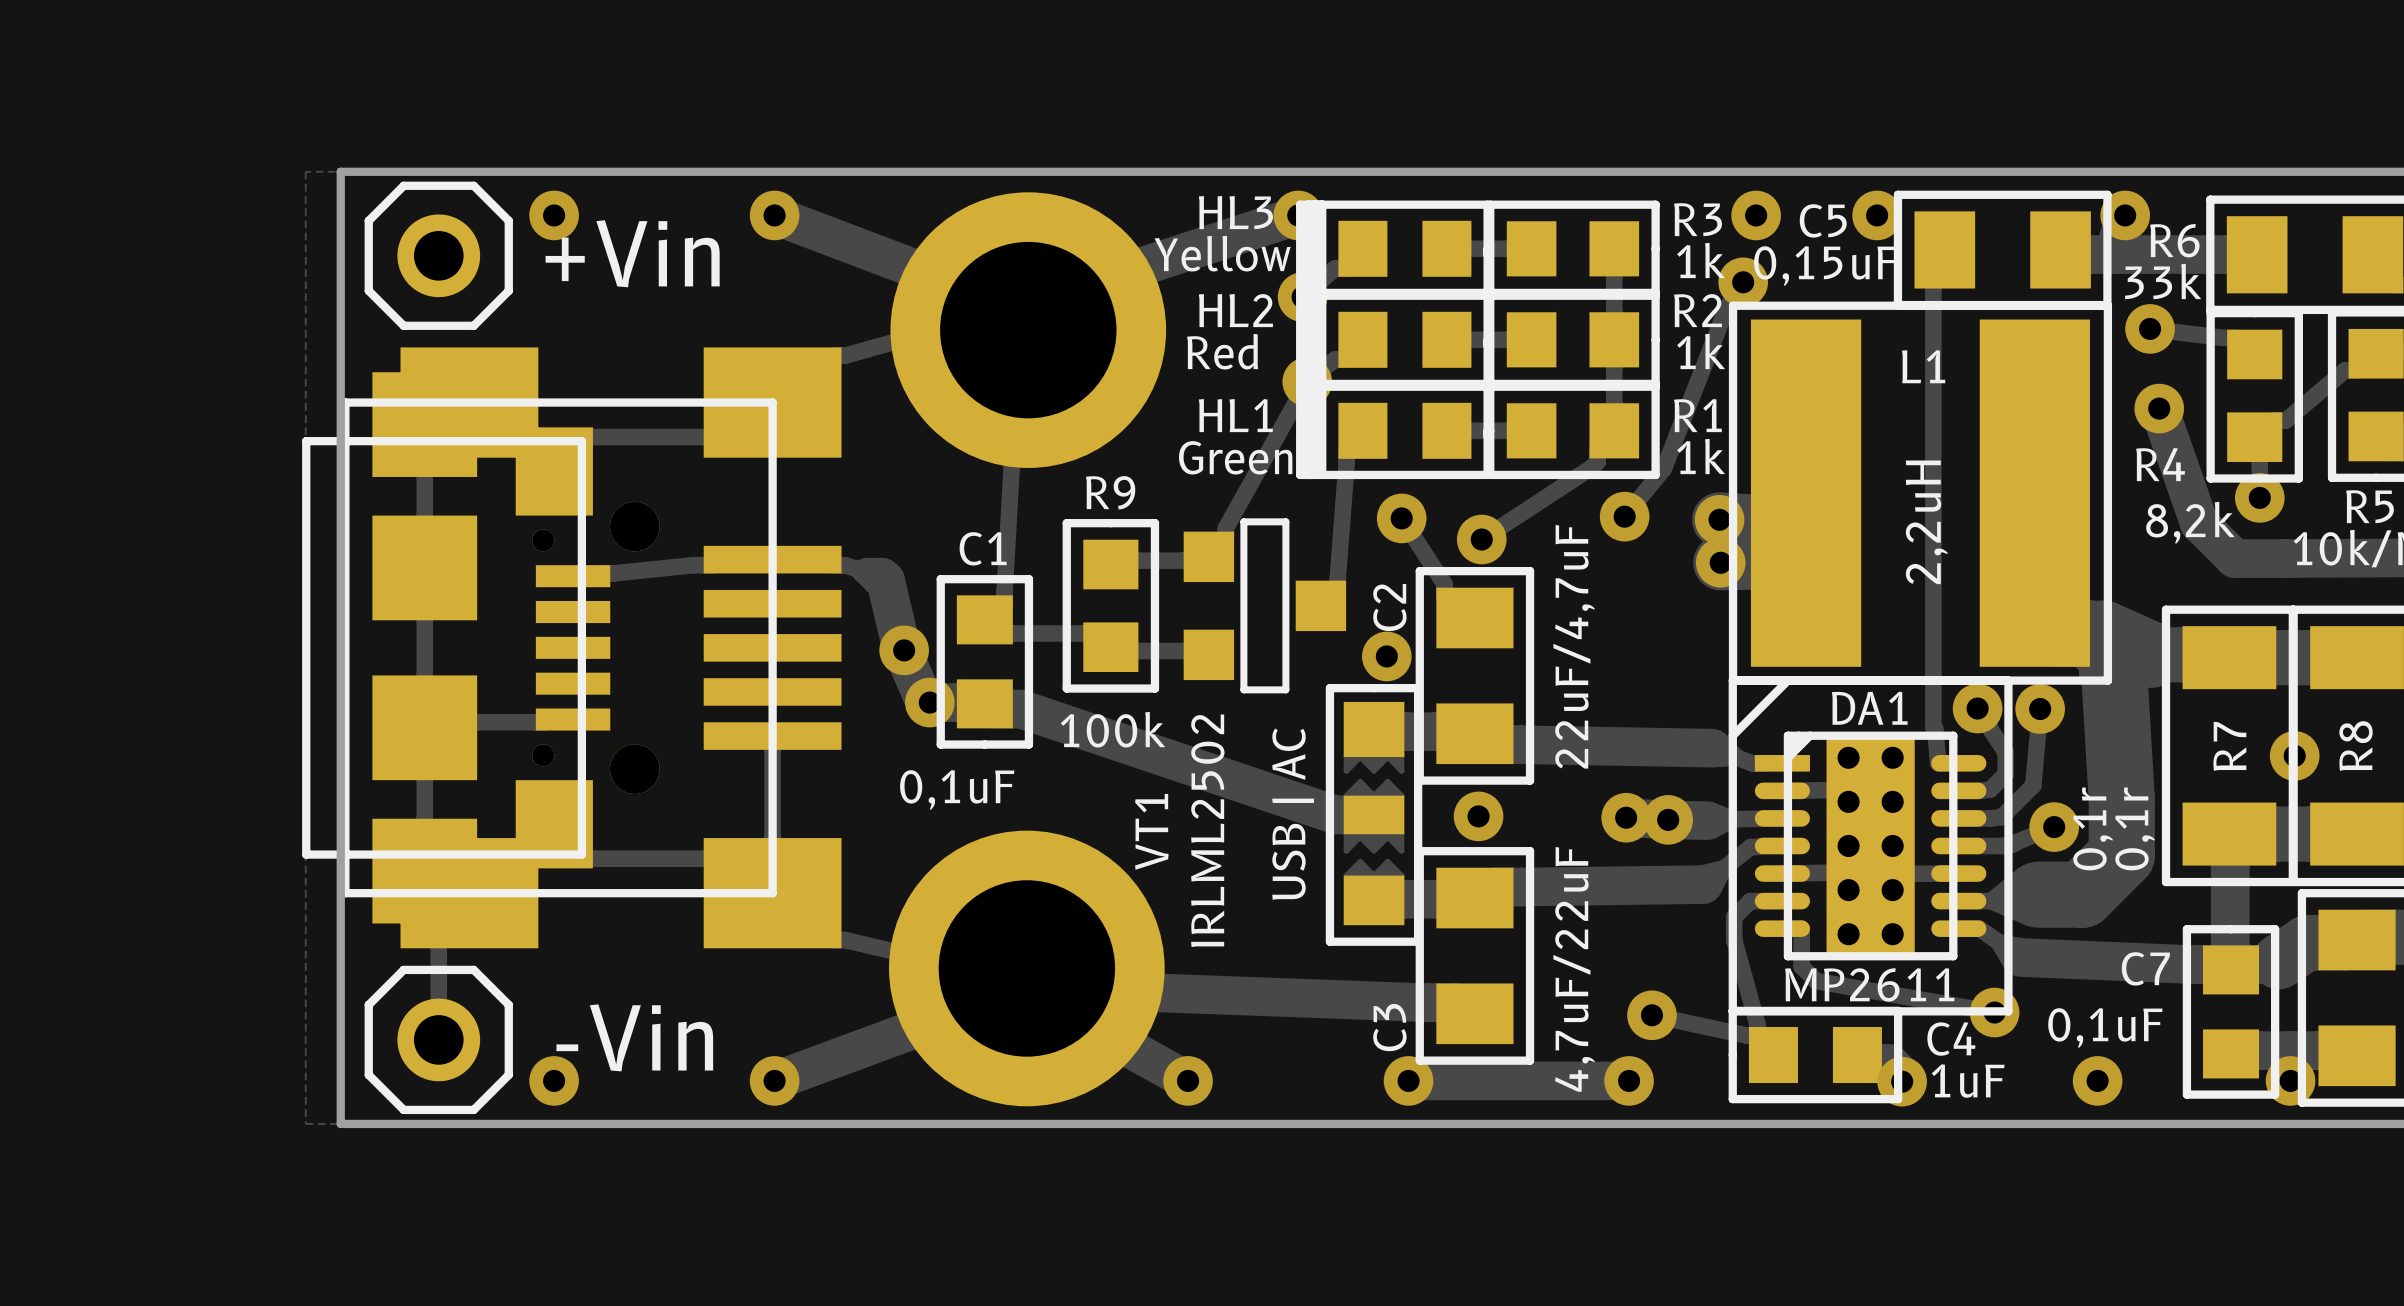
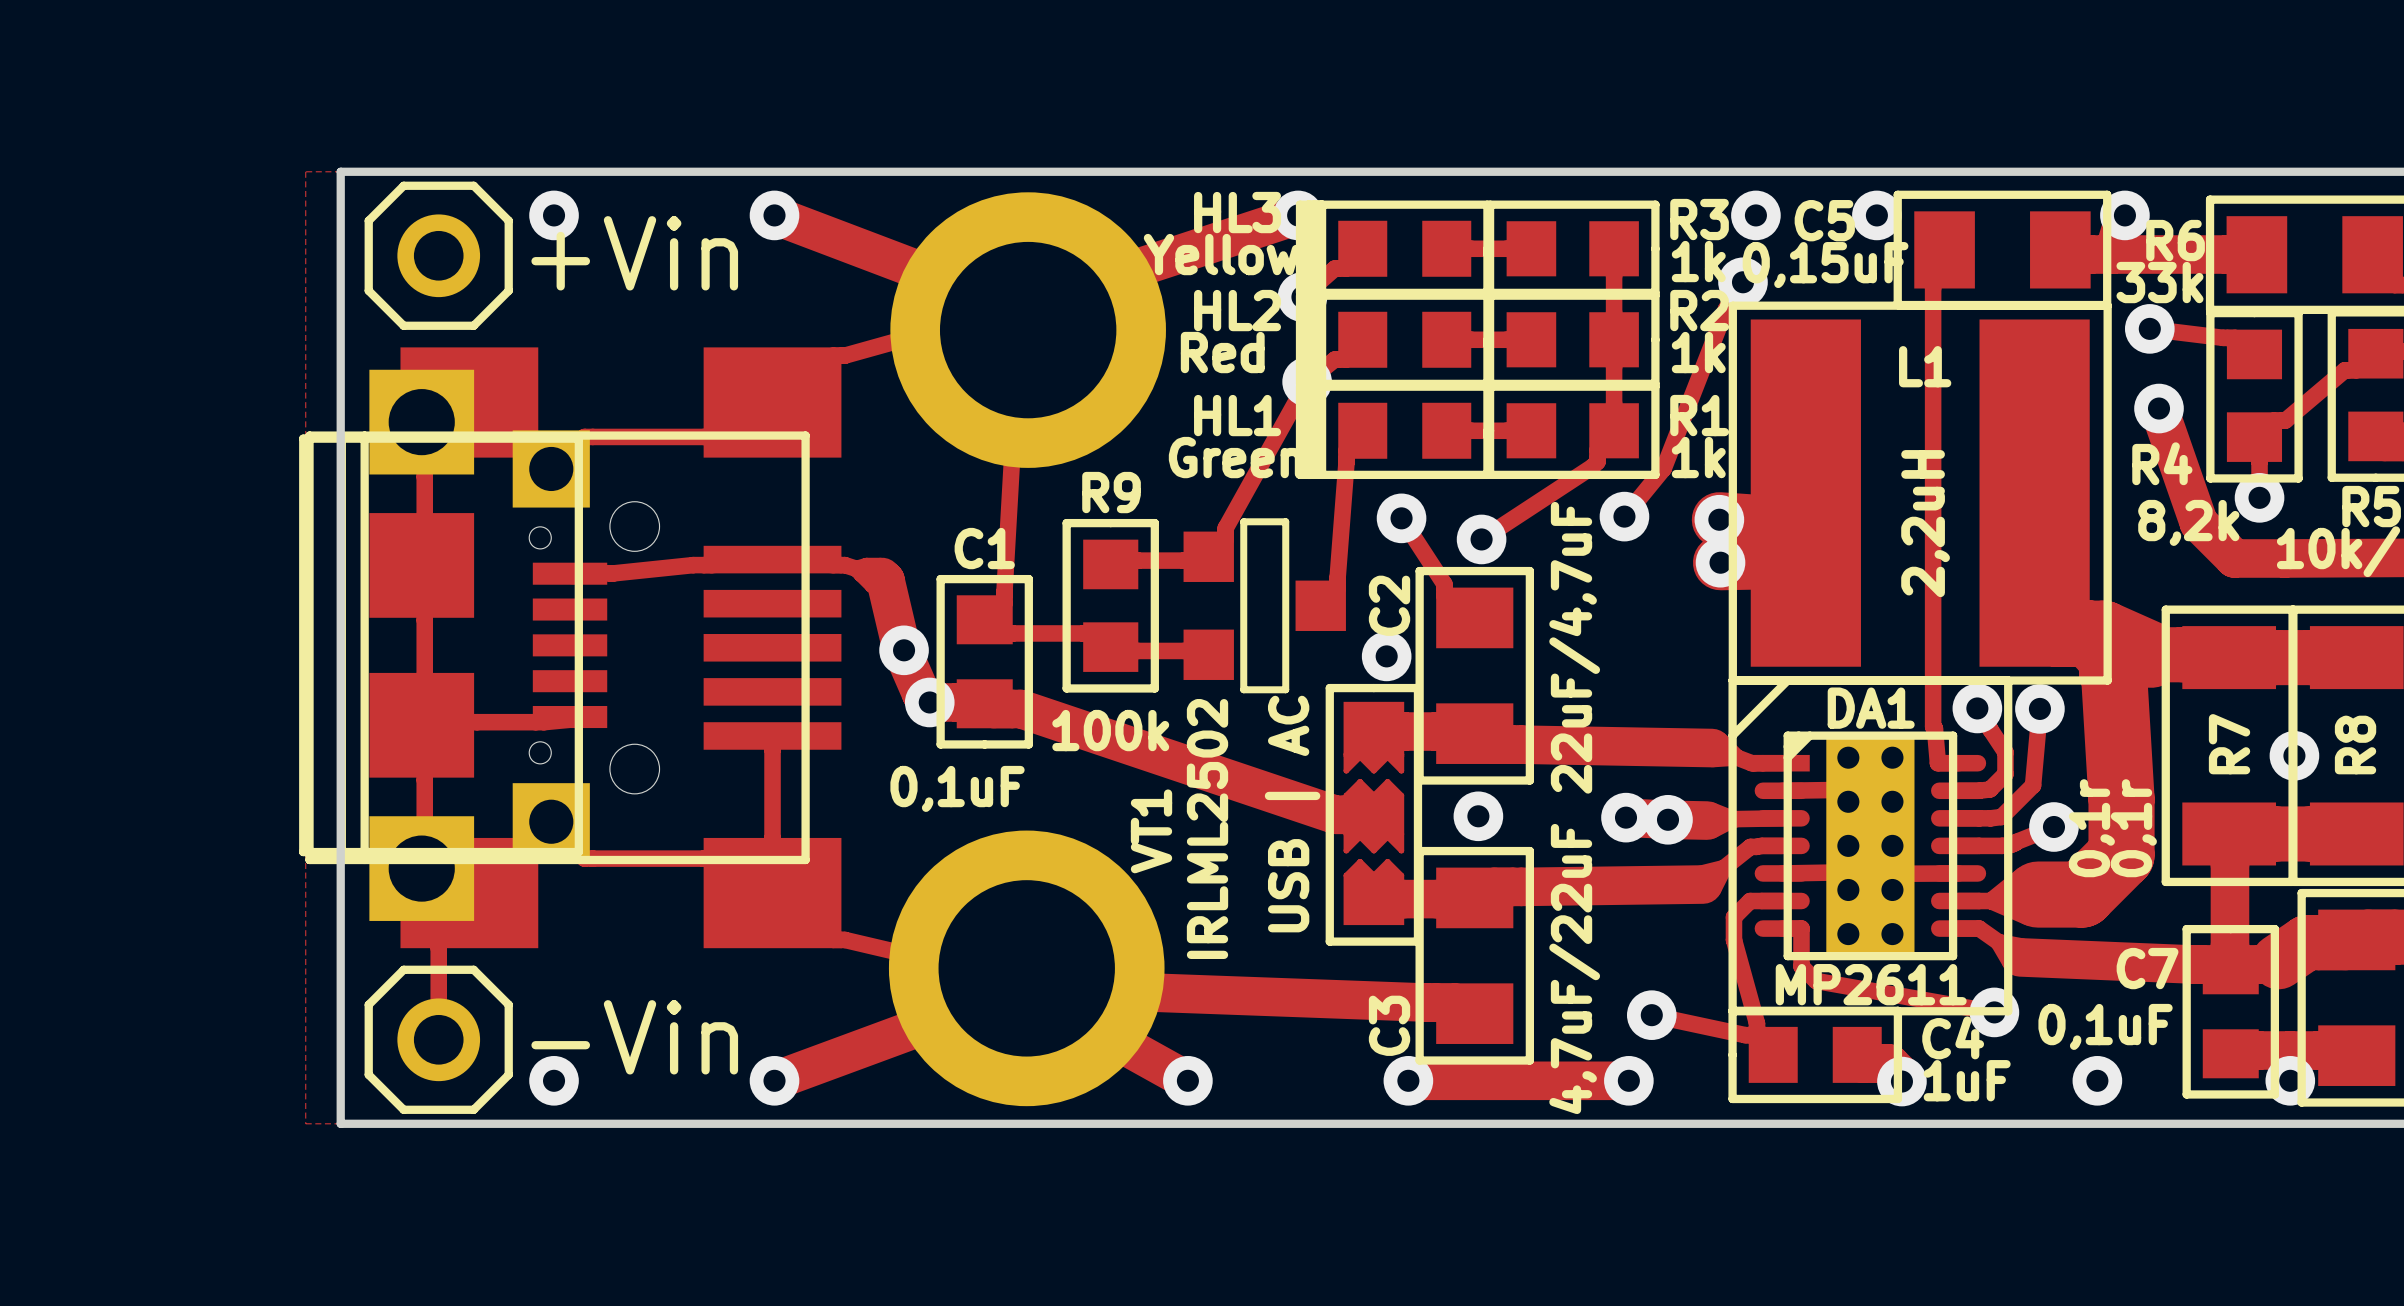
part footprint: [341, 347, 842, 949] -> [305, 347, 842, 949]
part footprint: [302, 372, 611, 924] -> [299, 369, 608, 921]

